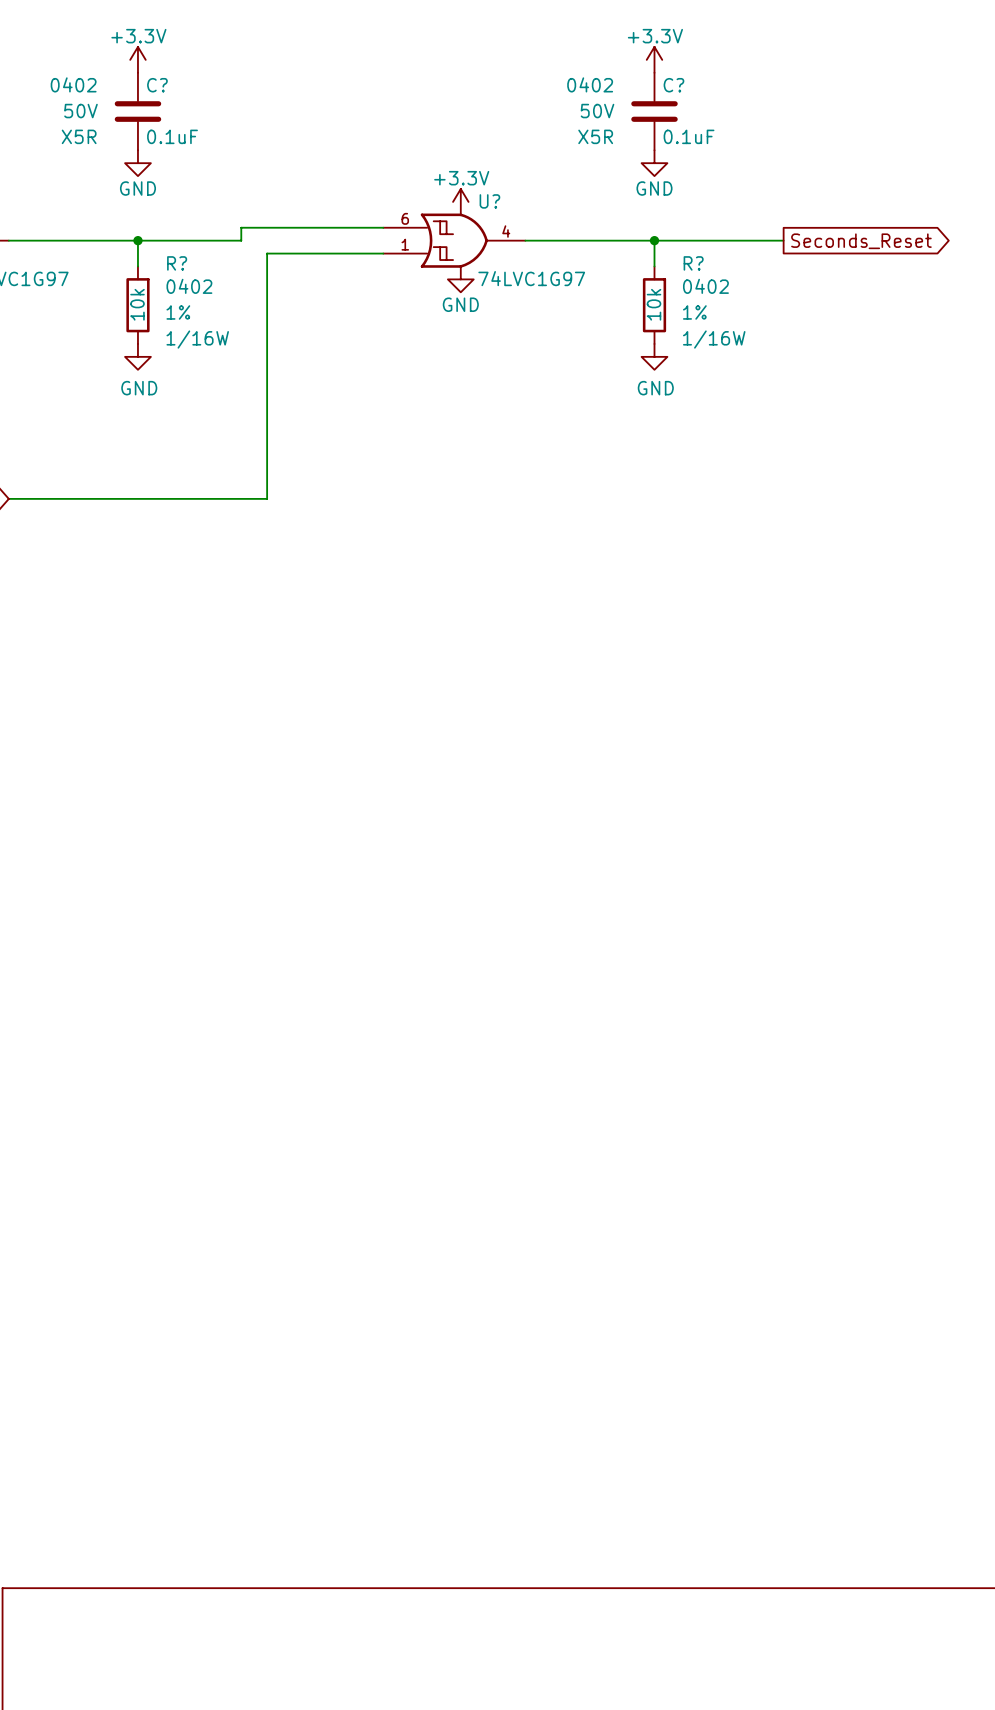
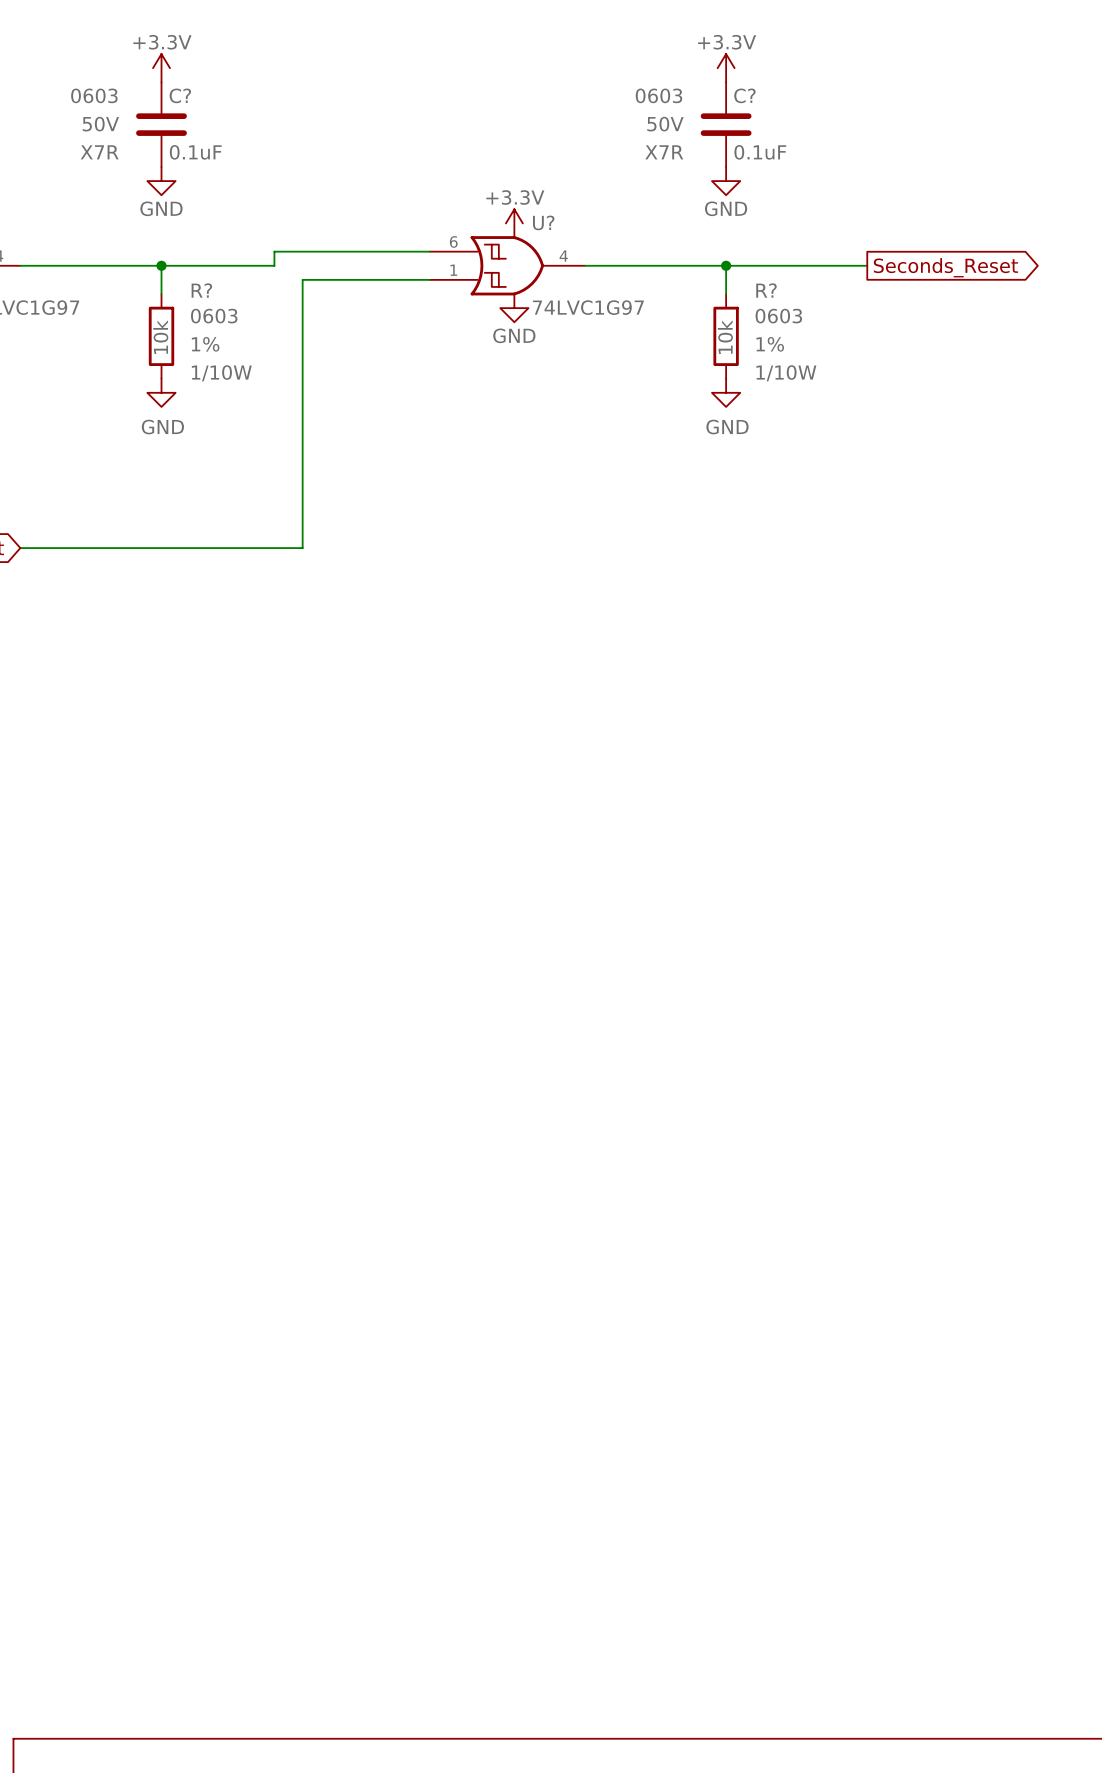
C? text: 0402 (73, 84) -> 0603 (94, 95)
C? text: 0402 (590, 84) -> 0603 (658, 95)
C? text: X5R (79, 136) -> X7R (99, 152)
C? text: X5R (595, 136) -> X7R (664, 152)
R? text: 0402 (189, 286) -> 0603 (214, 316)
R? text: 0402 (705, 286) -> 0603 (778, 316)
R? text: 1/16W (197, 339) -> 1/10W (221, 373)
R? text: 1/16W (714, 339) -> 1/10W (786, 373)

